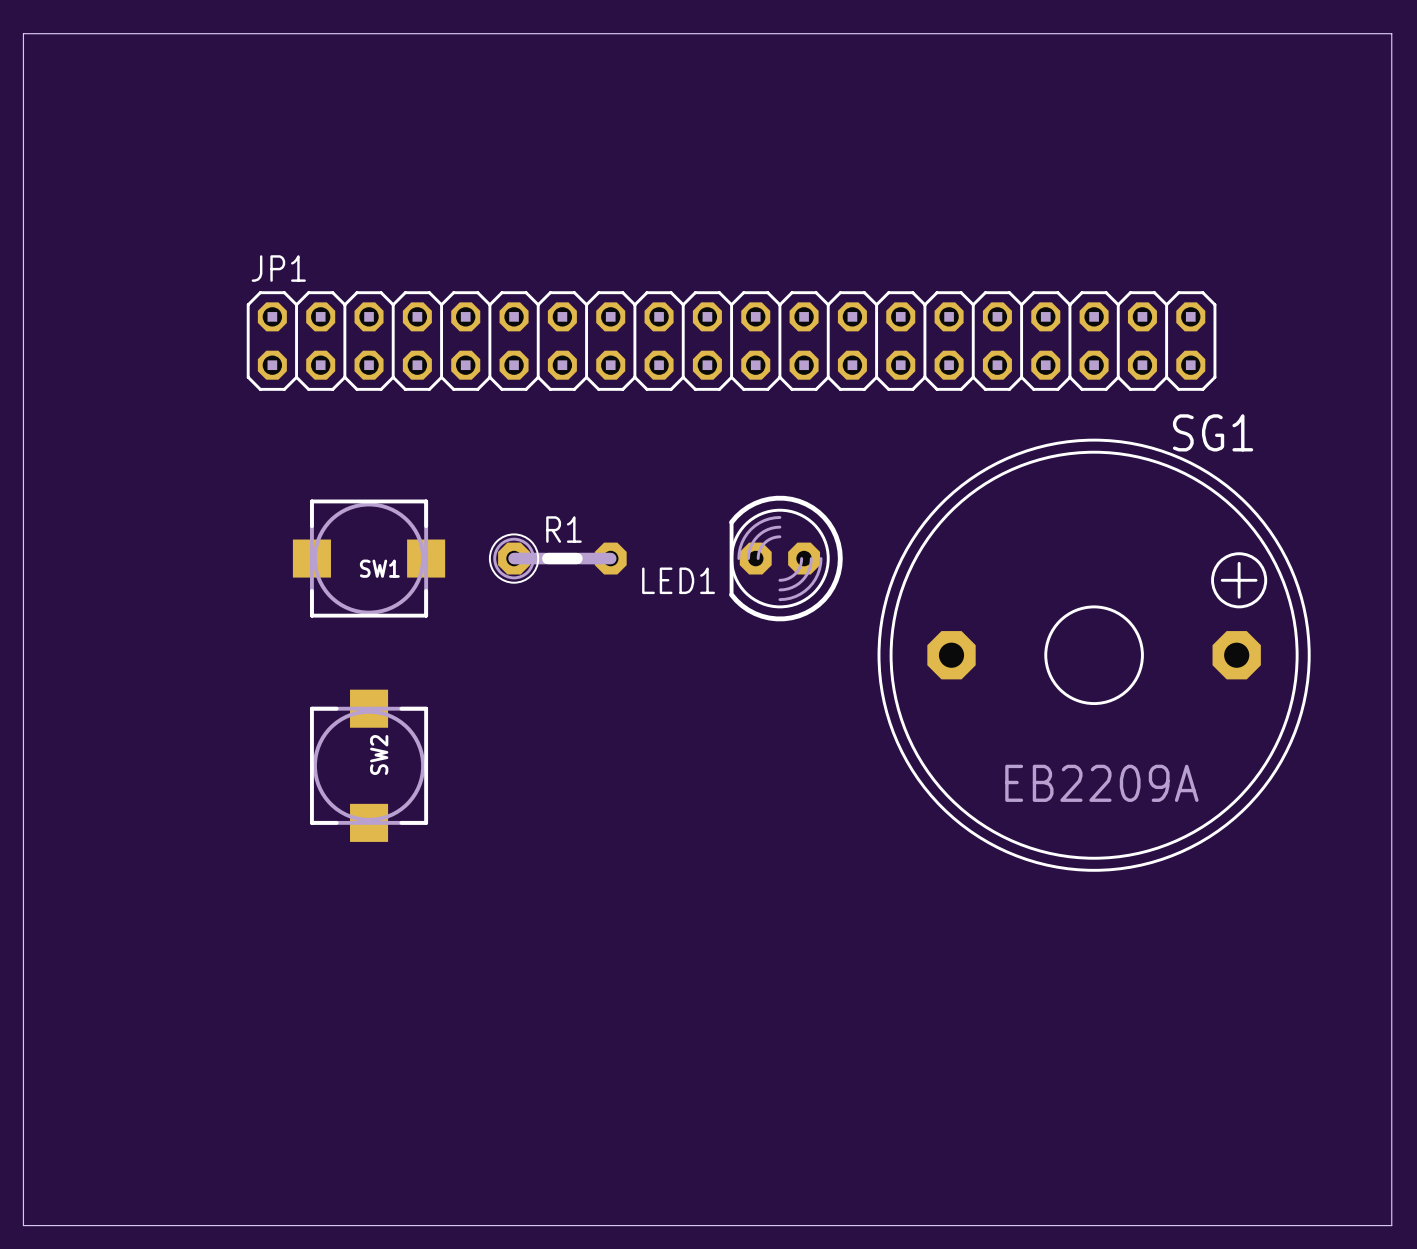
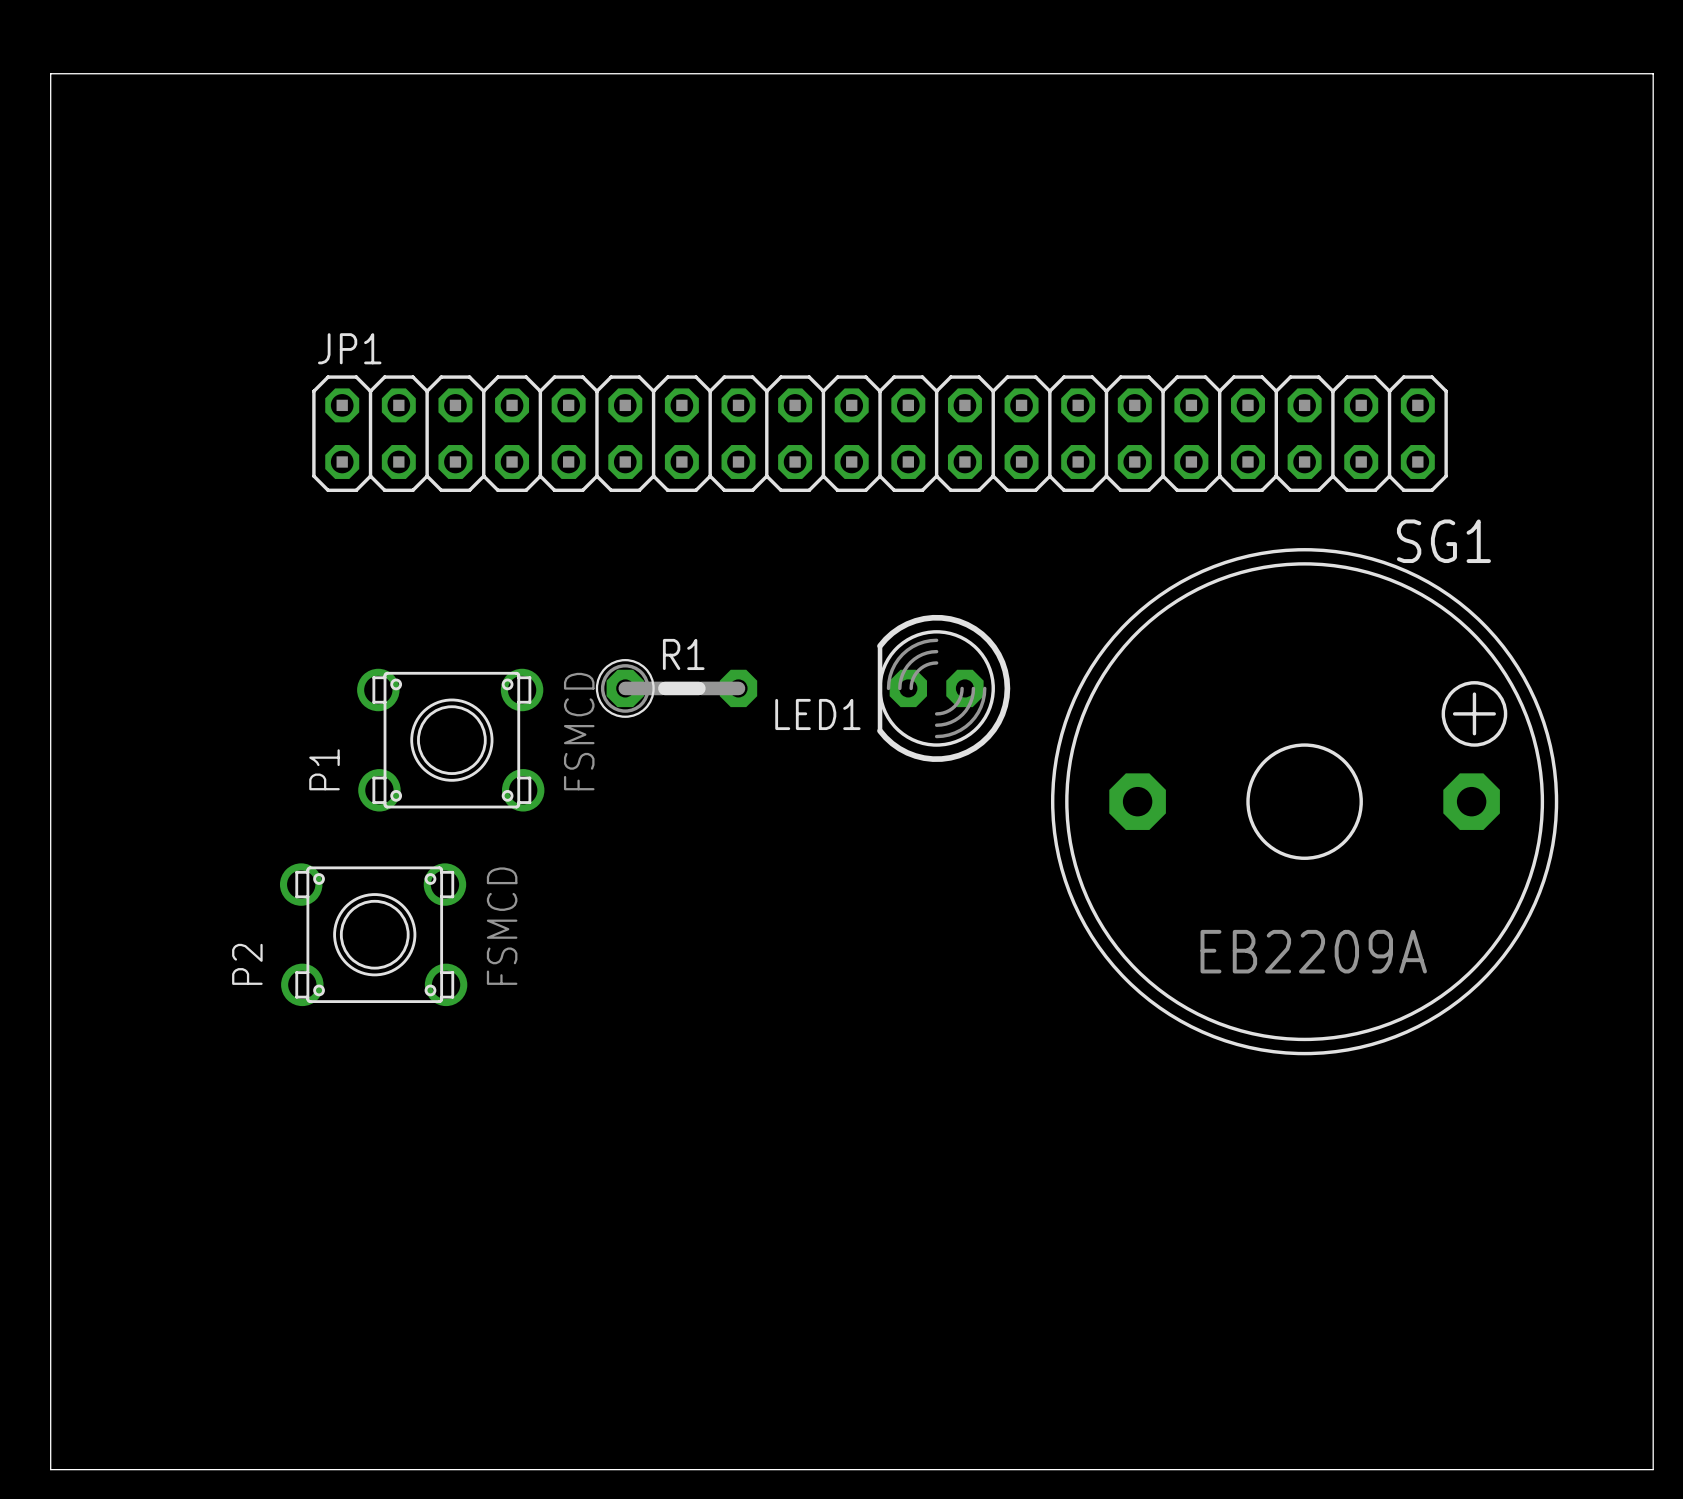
SW1: (369, 558) -> none
P1: none -> FSMCD (450, 740)
SW2: (369, 765) -> none
P2: none -> FSMCD (373, 934)

